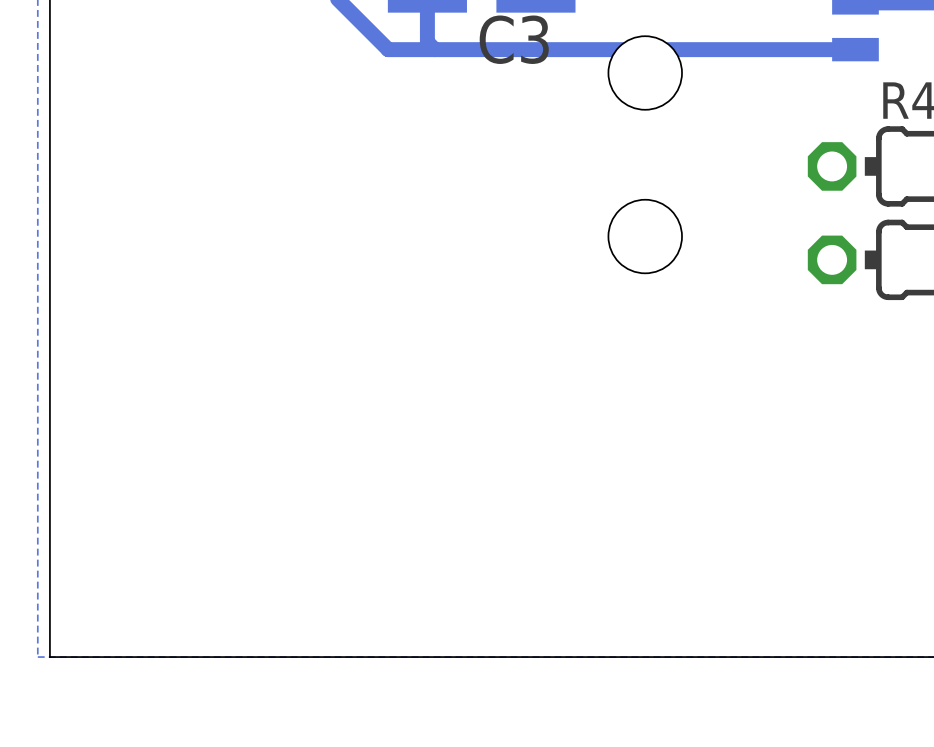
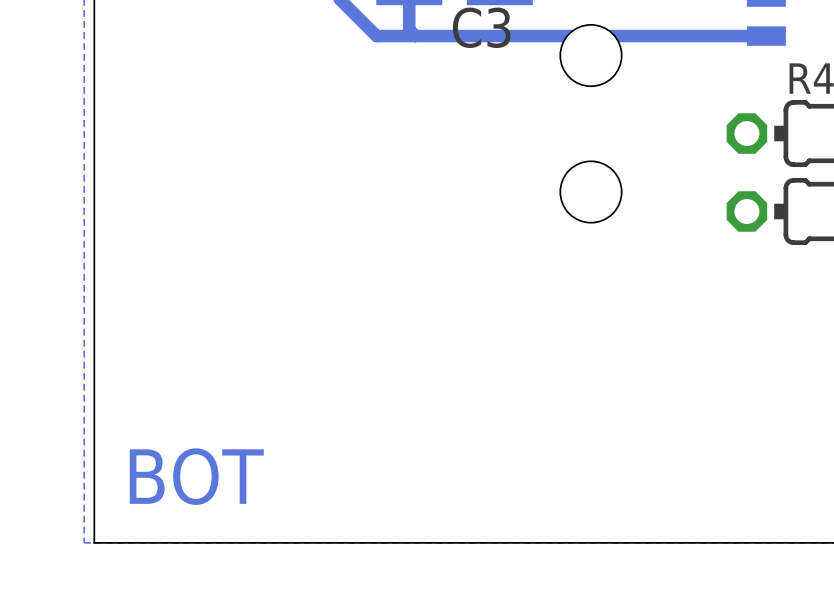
text: none -> BOT (196, 476)

